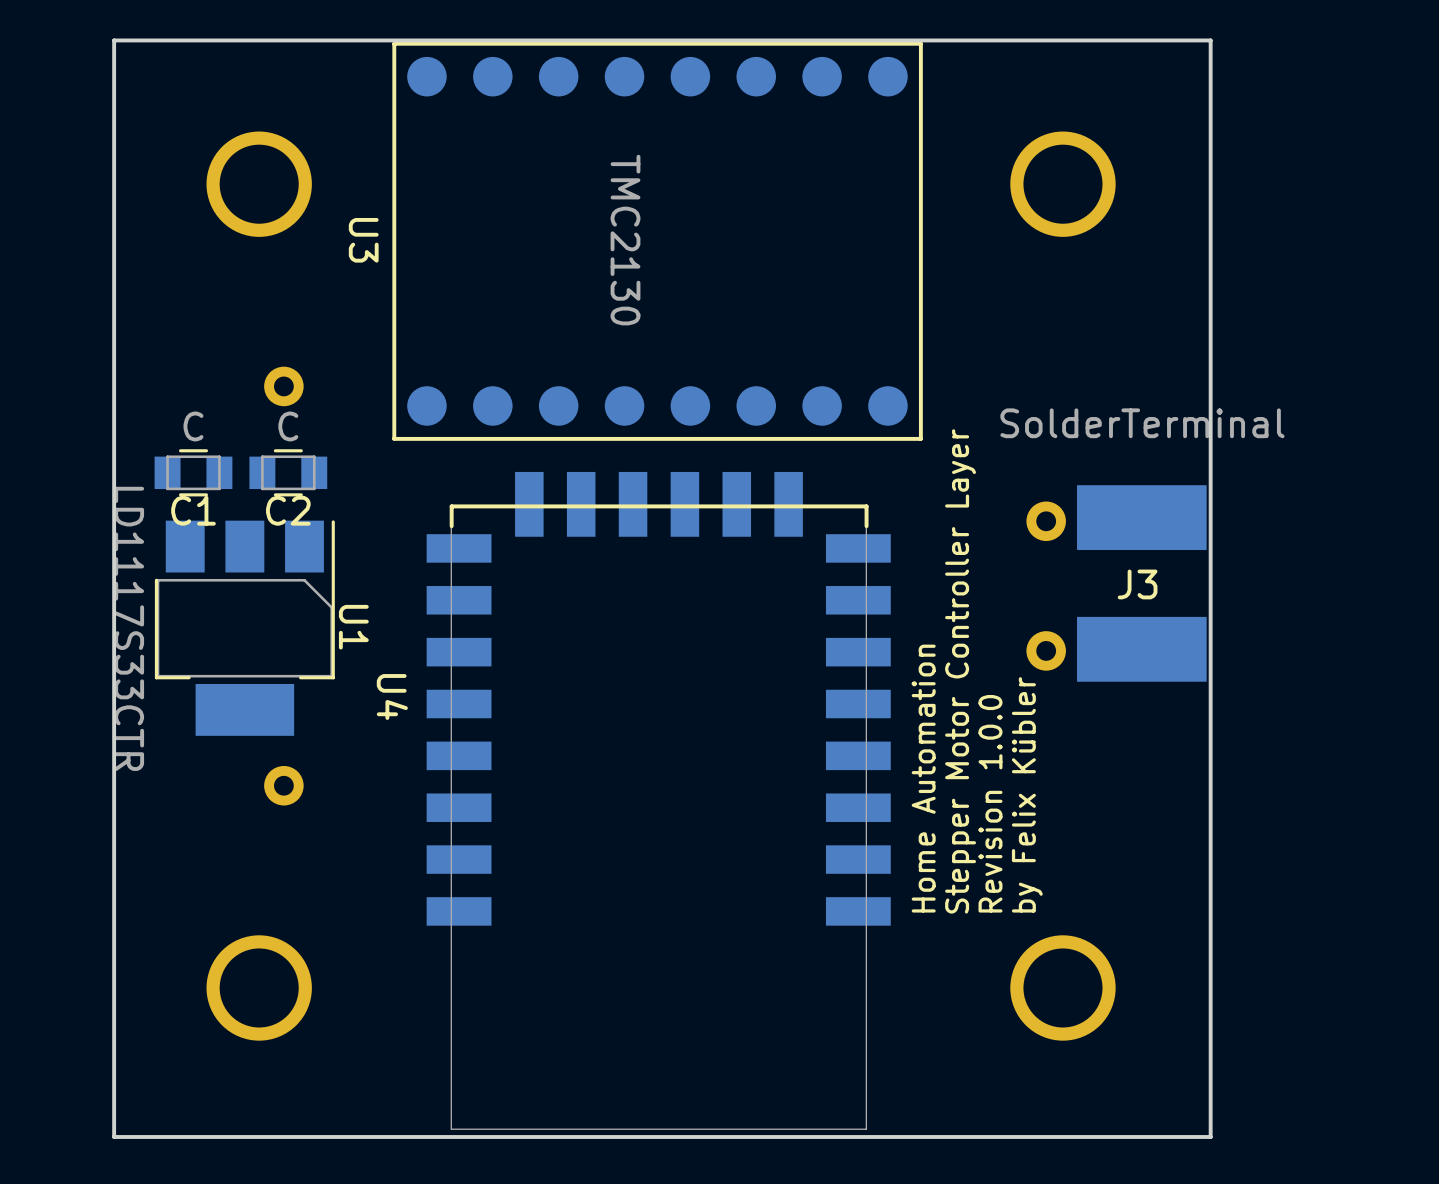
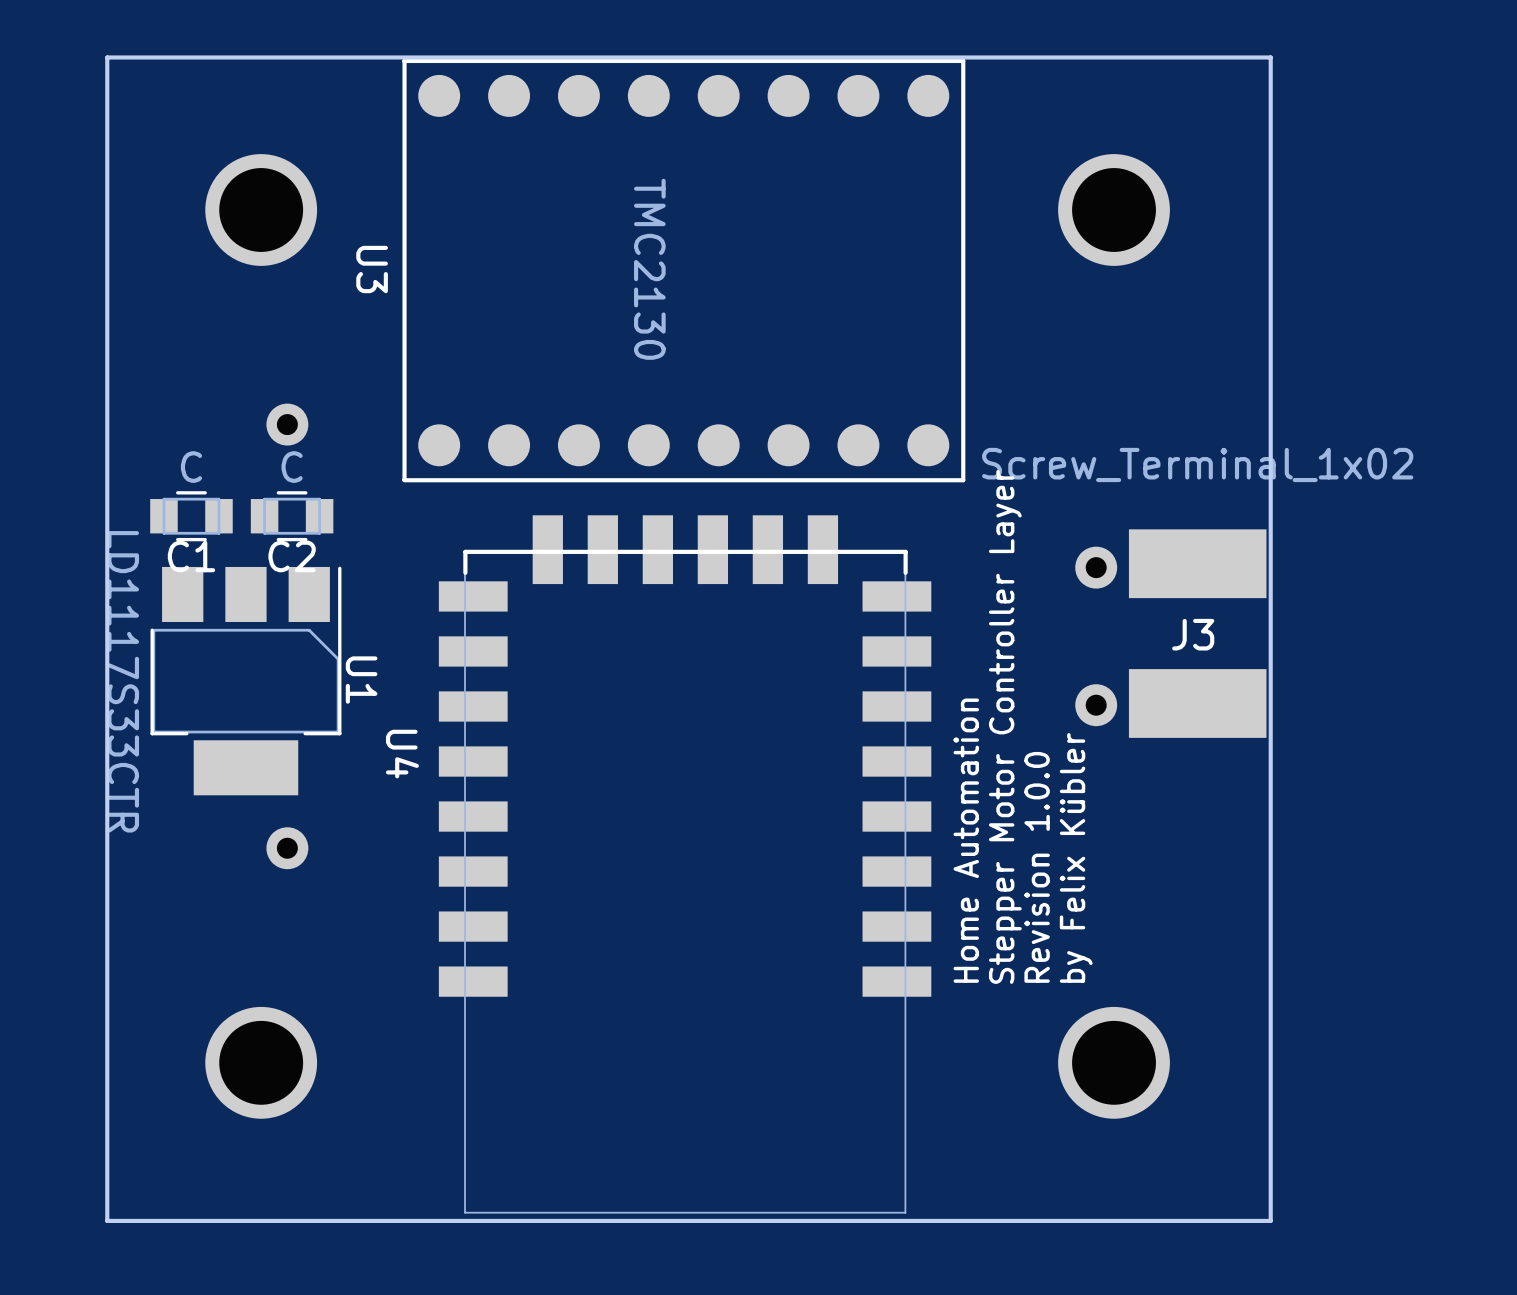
J3 value: SolderTerminal (1142, 423) -> Screw_Terminal_1x02 (1197, 464)

